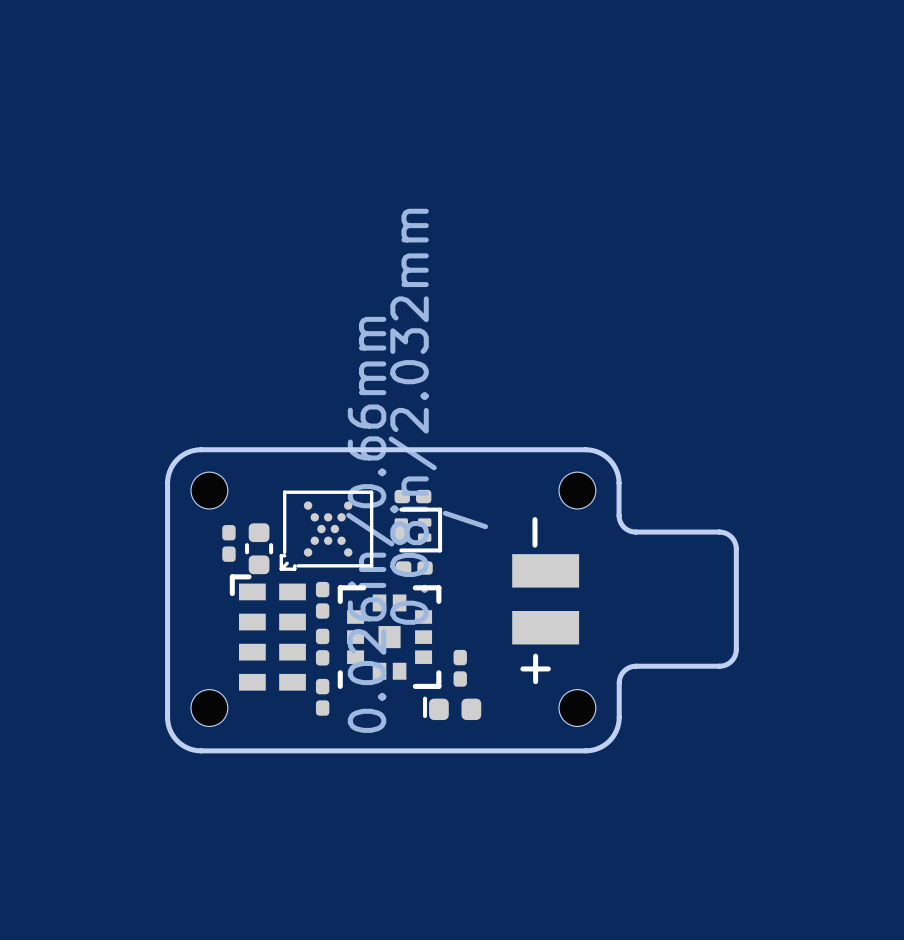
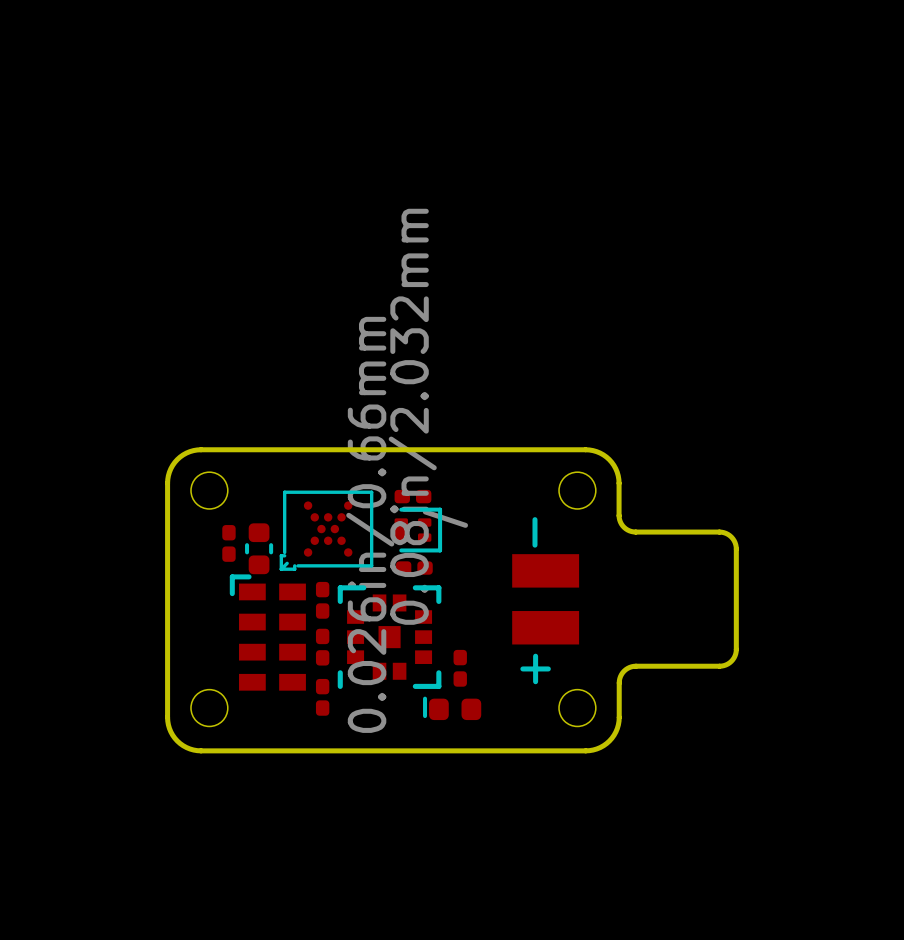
line: (445, 513) (485, 526) -> (425, 511) (465, 525)

